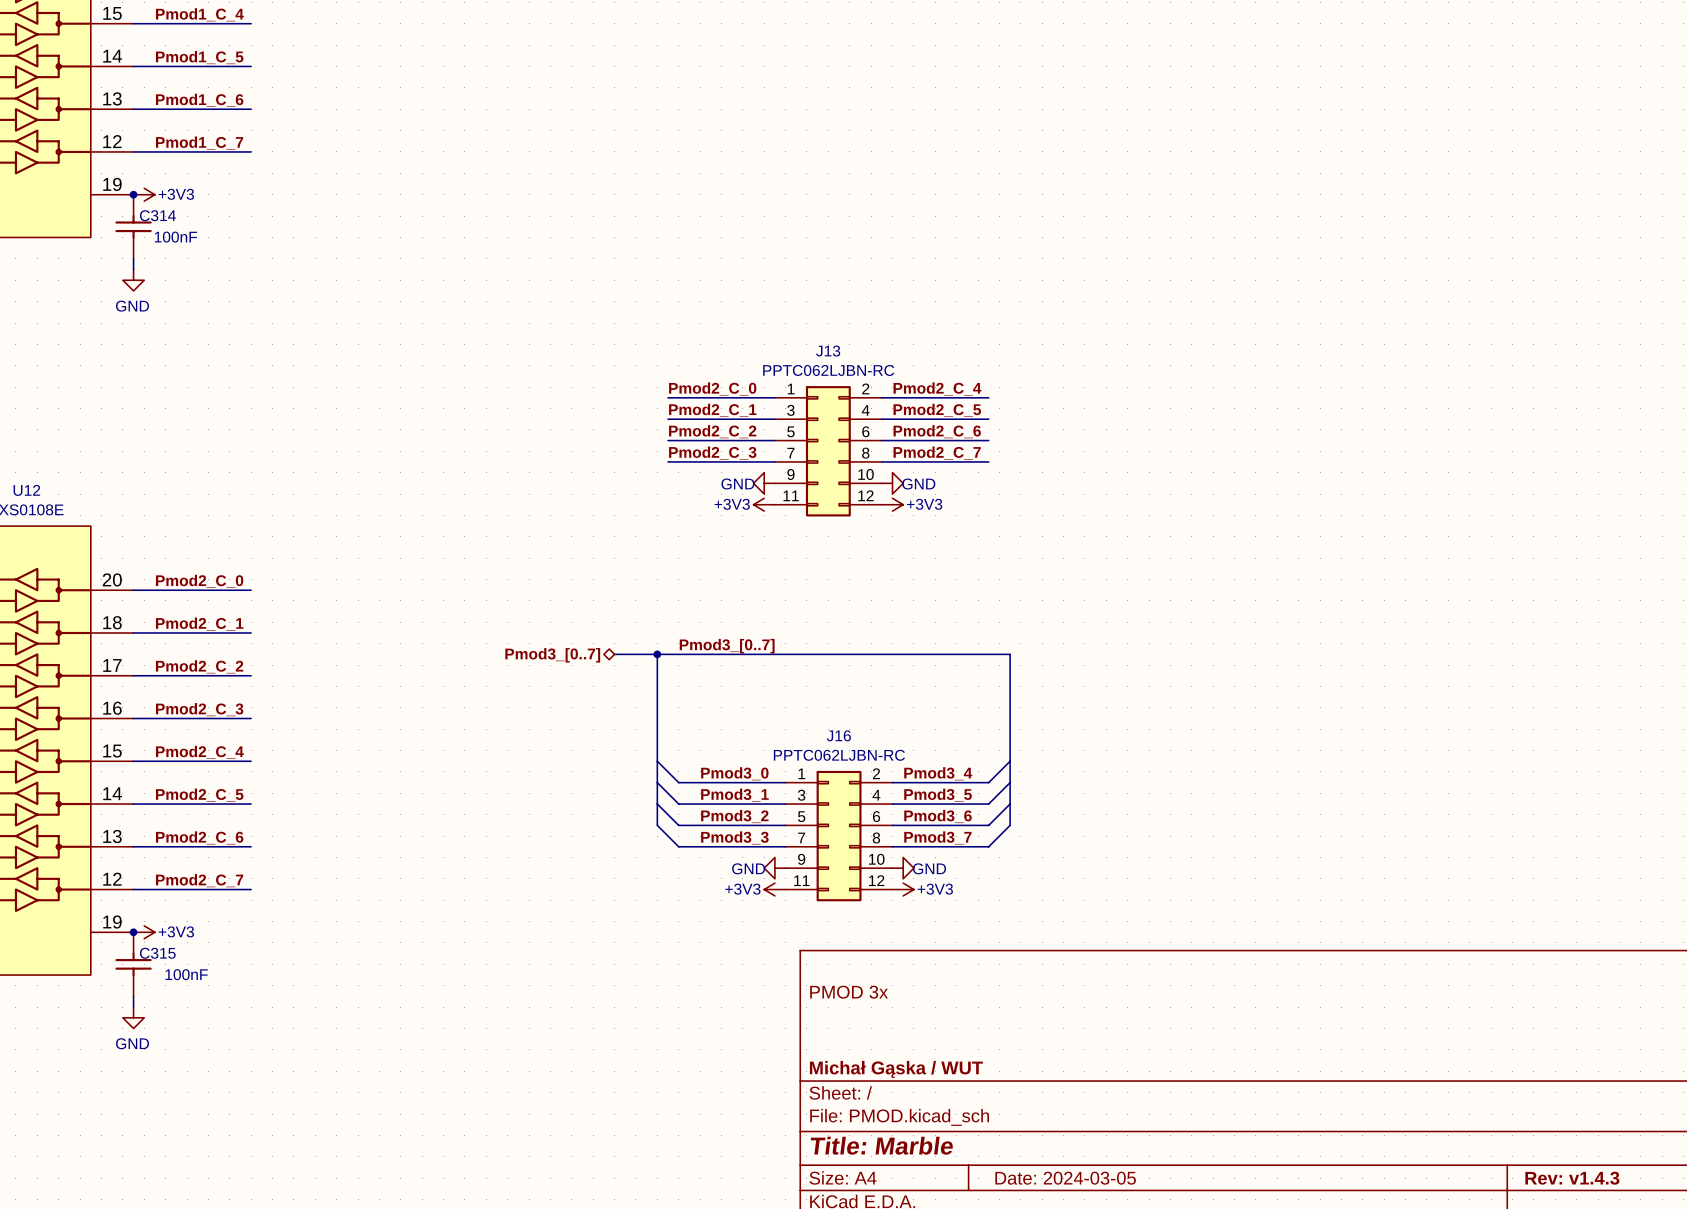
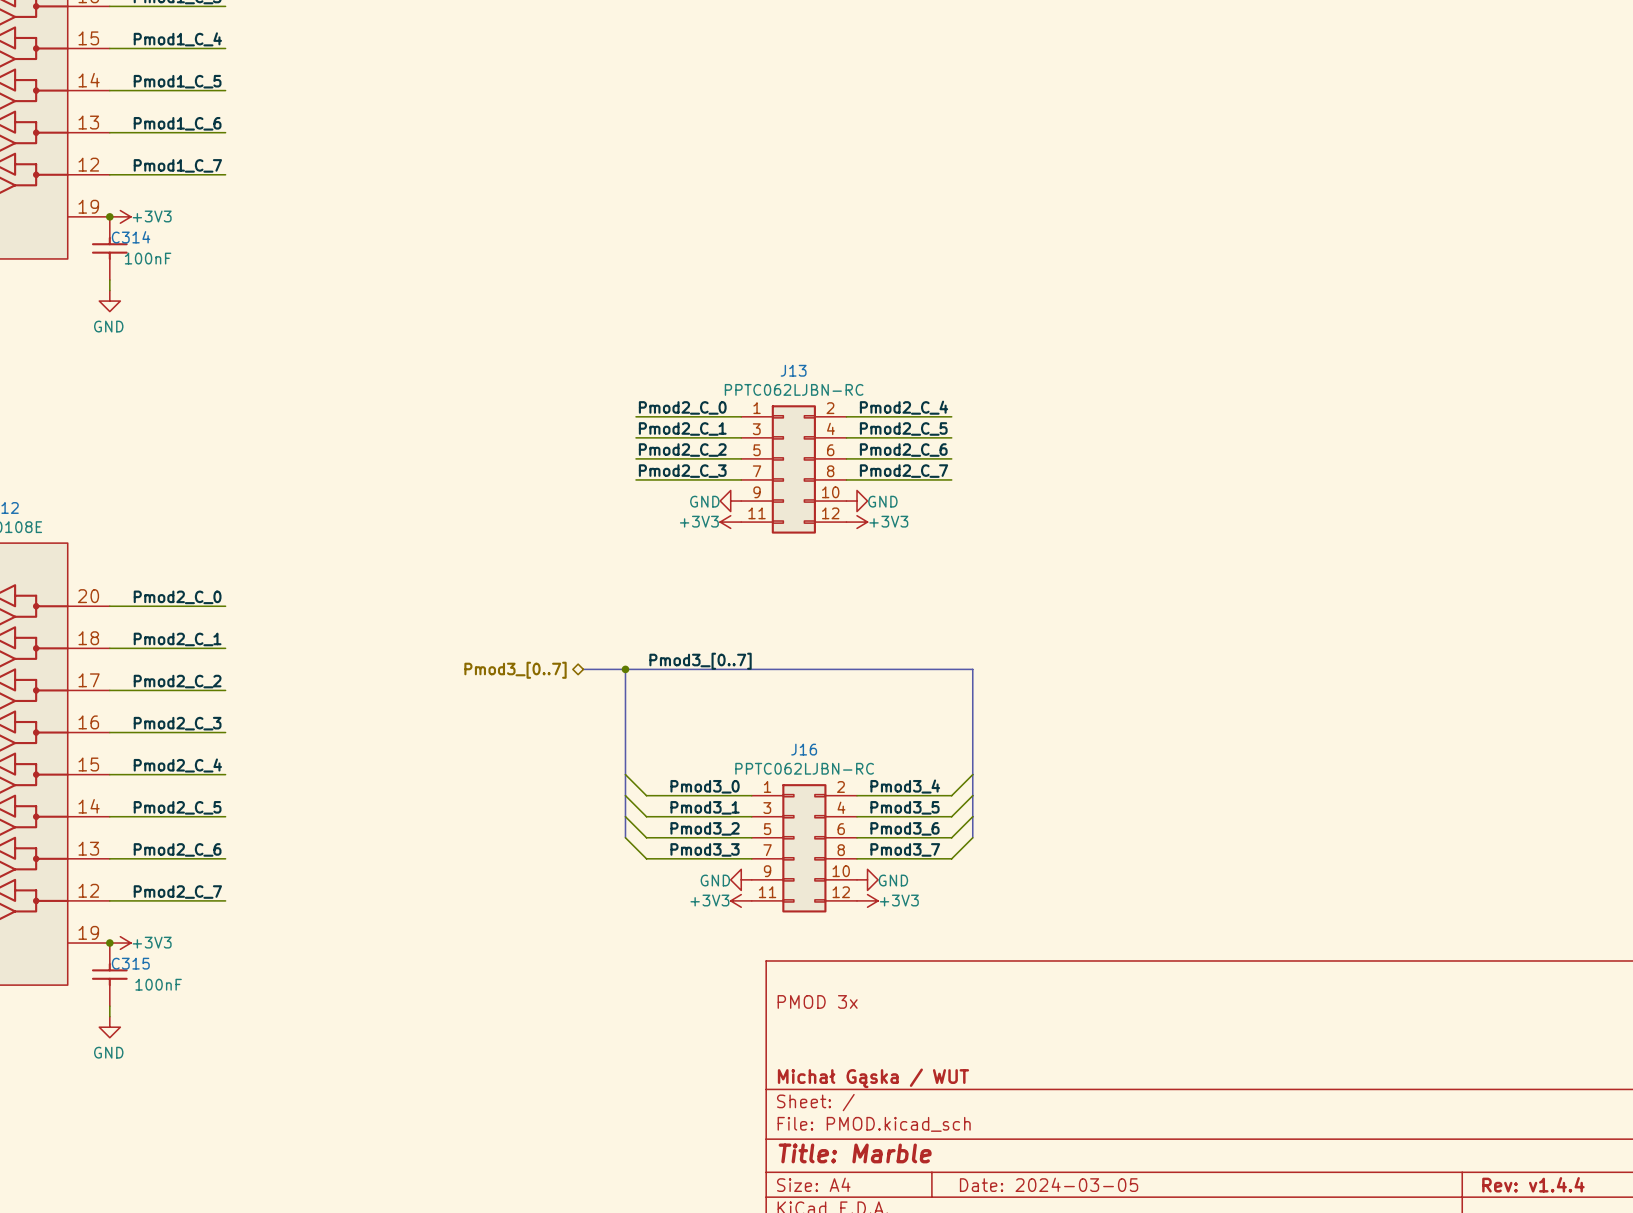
title block: Rev: v1.4.3 (1572, 1178) -> Rev: v1.4.4 (1533, 1184)

